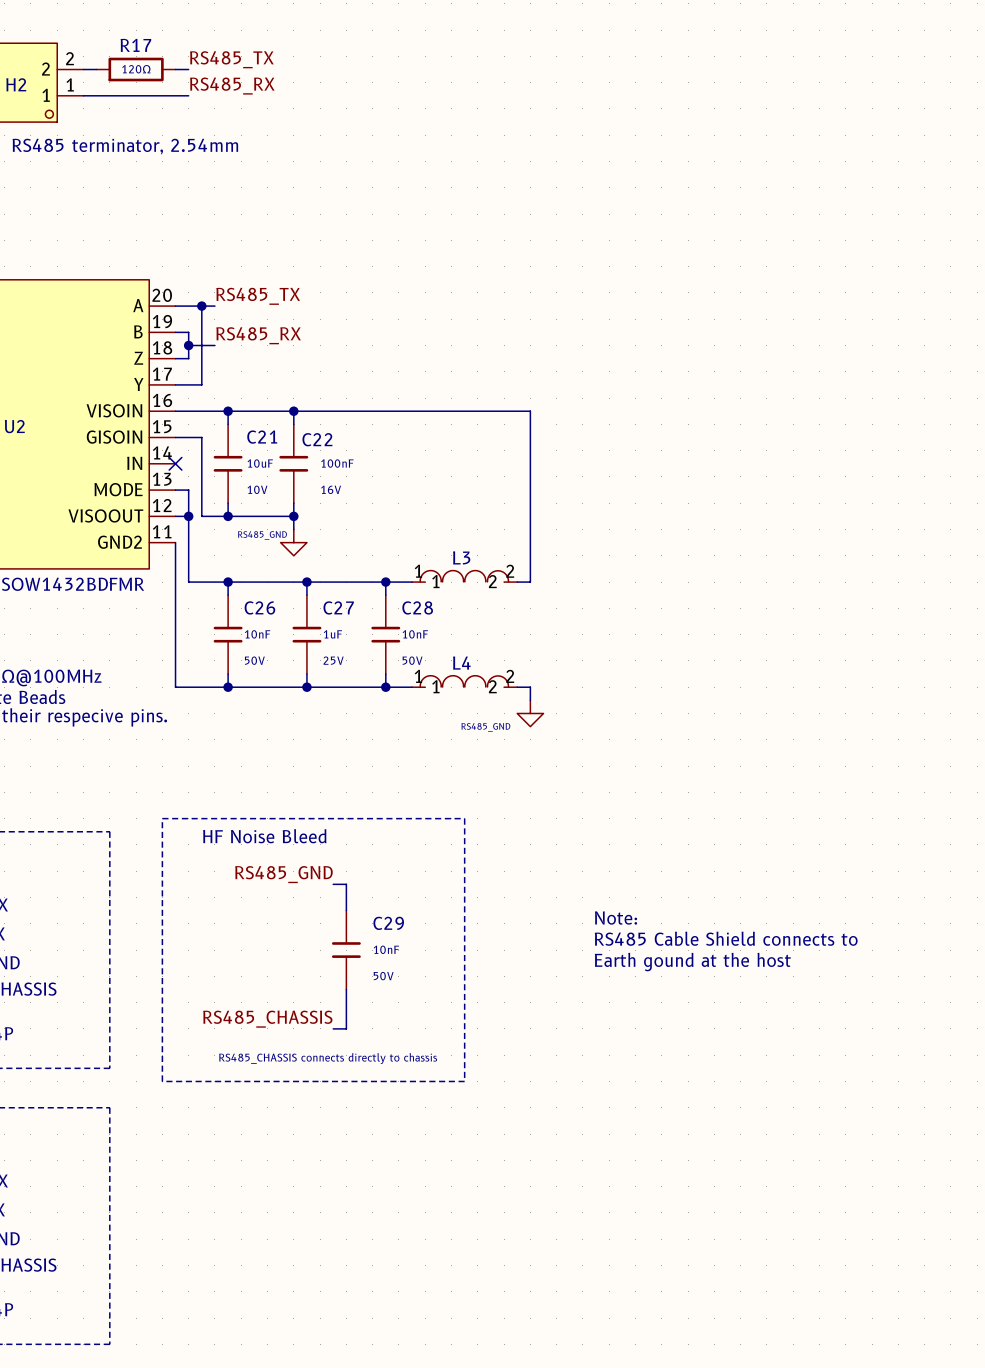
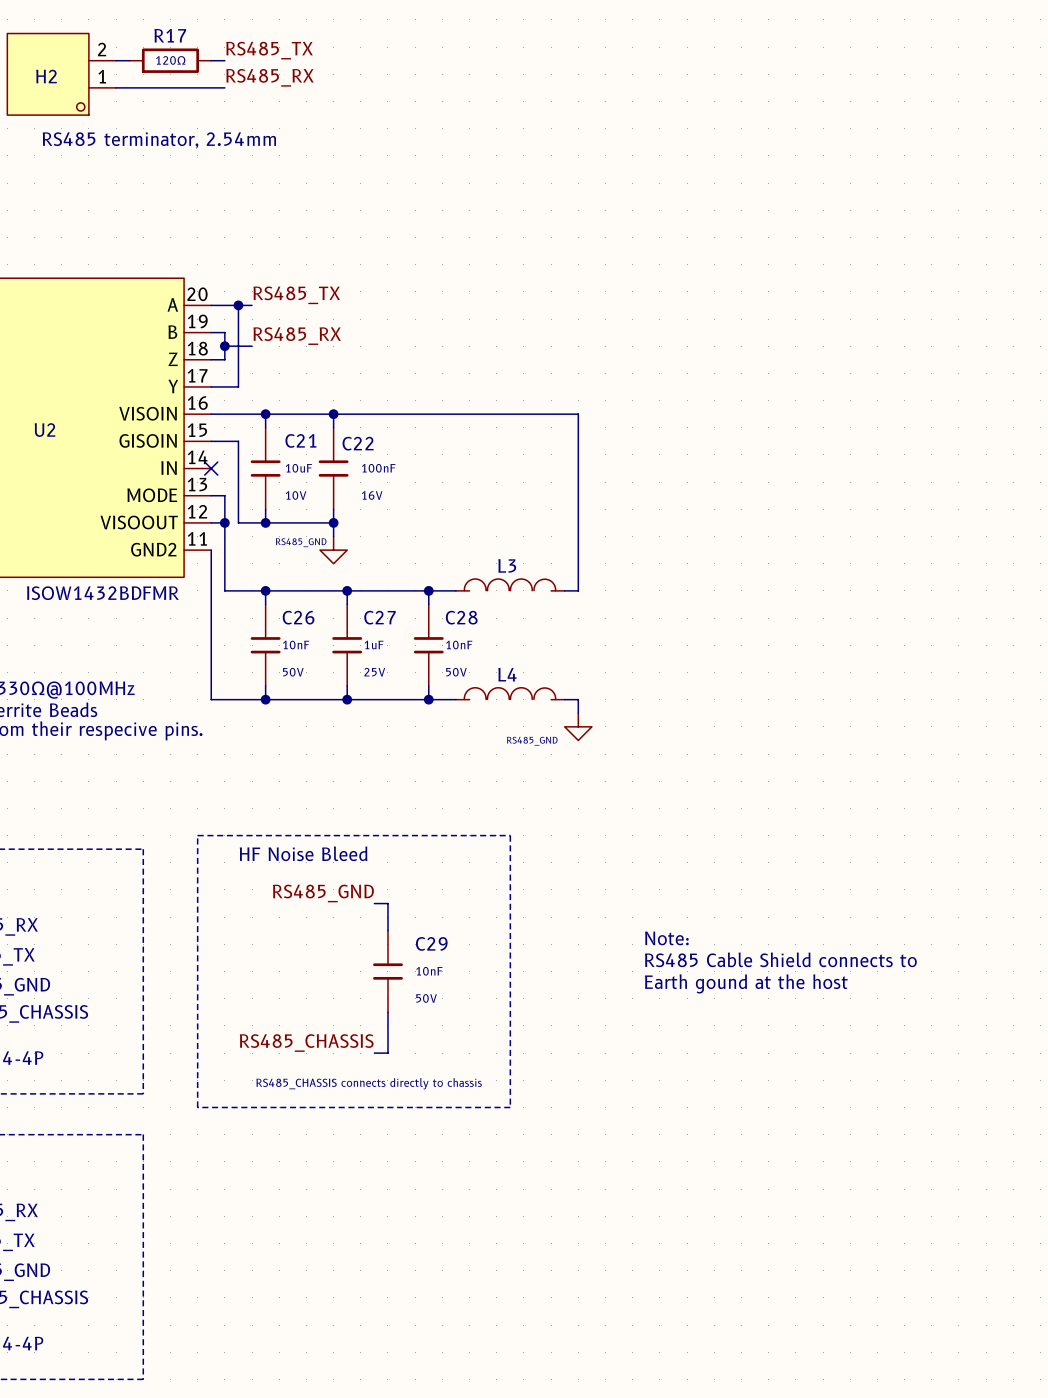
H2 pin name: 2 (45, 69) -> none
H2 pin name: 1 (46, 95) -> none
L3 pin number: 1 (418, 571) -> none
L3 pin number: 2 (510, 571) -> none
L3 pin name: 1 (435, 581) -> none
L3 pin name: 2 (492, 581) -> none
L4 pin number: 1 (418, 676) -> none
L4 pin number: 2 (510, 676) -> none
L4 pin name: 1 (435, 686) -> none
L4 pin name: 2 (492, 686) -> none

